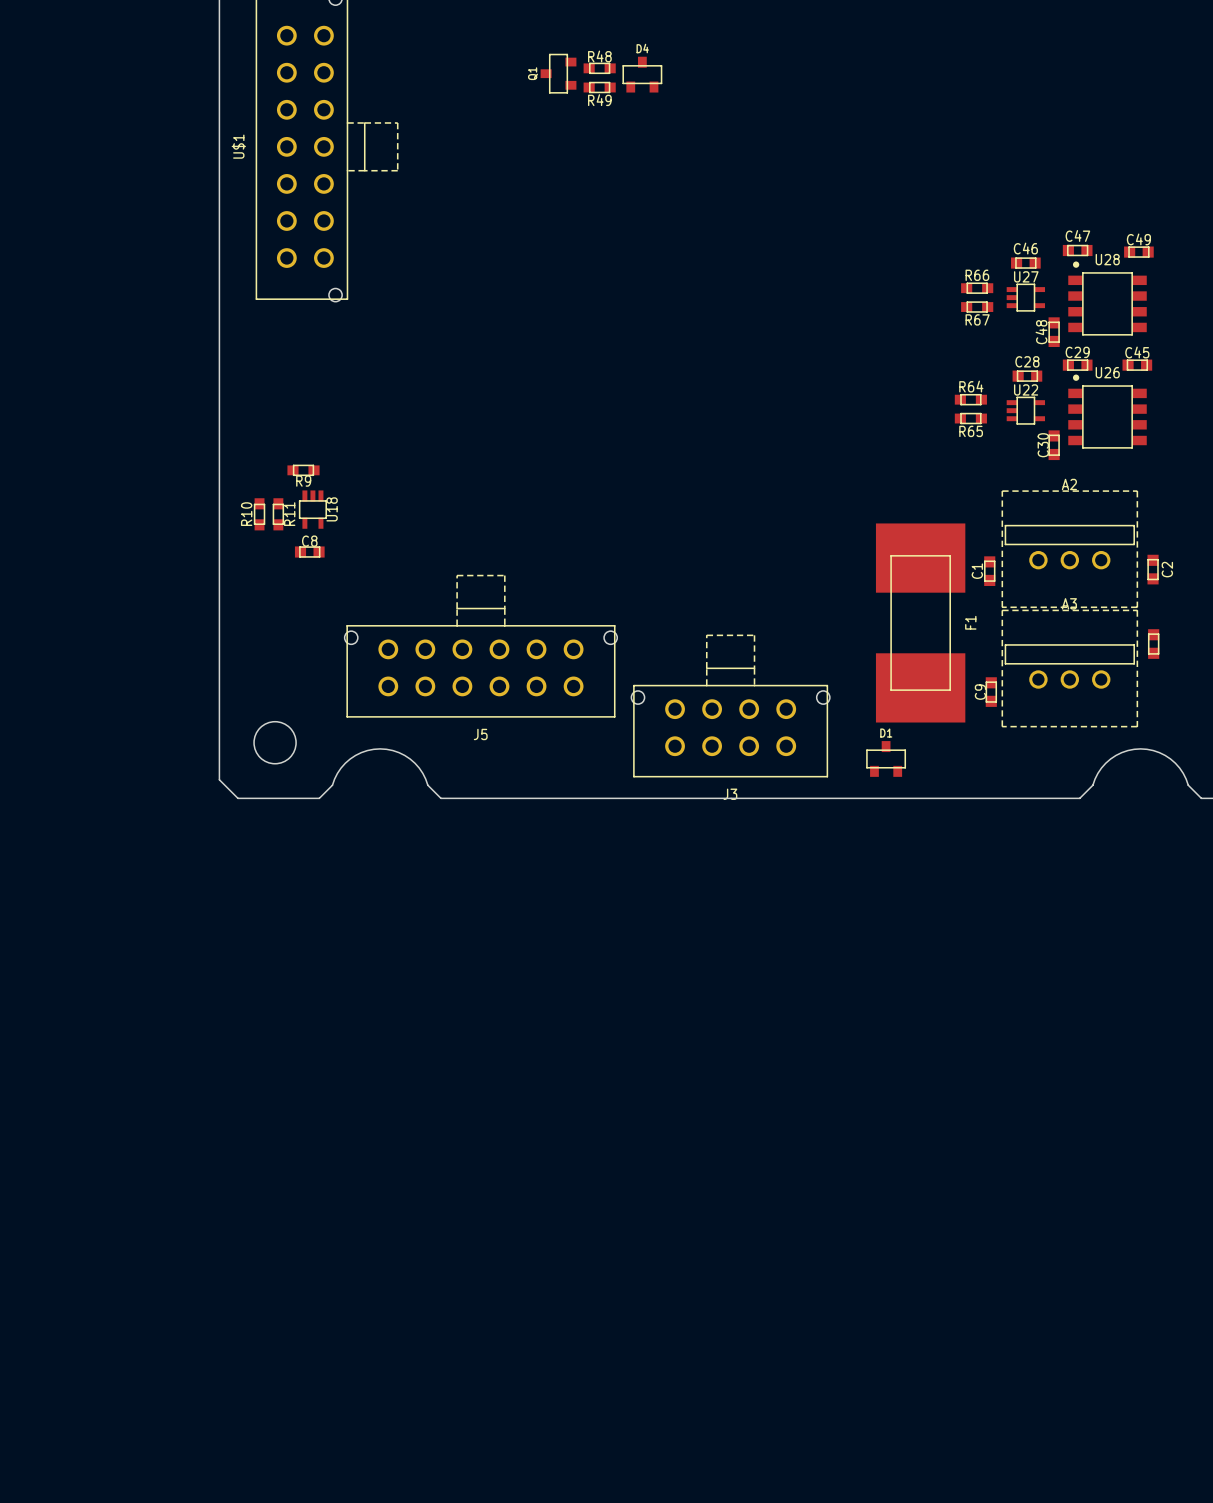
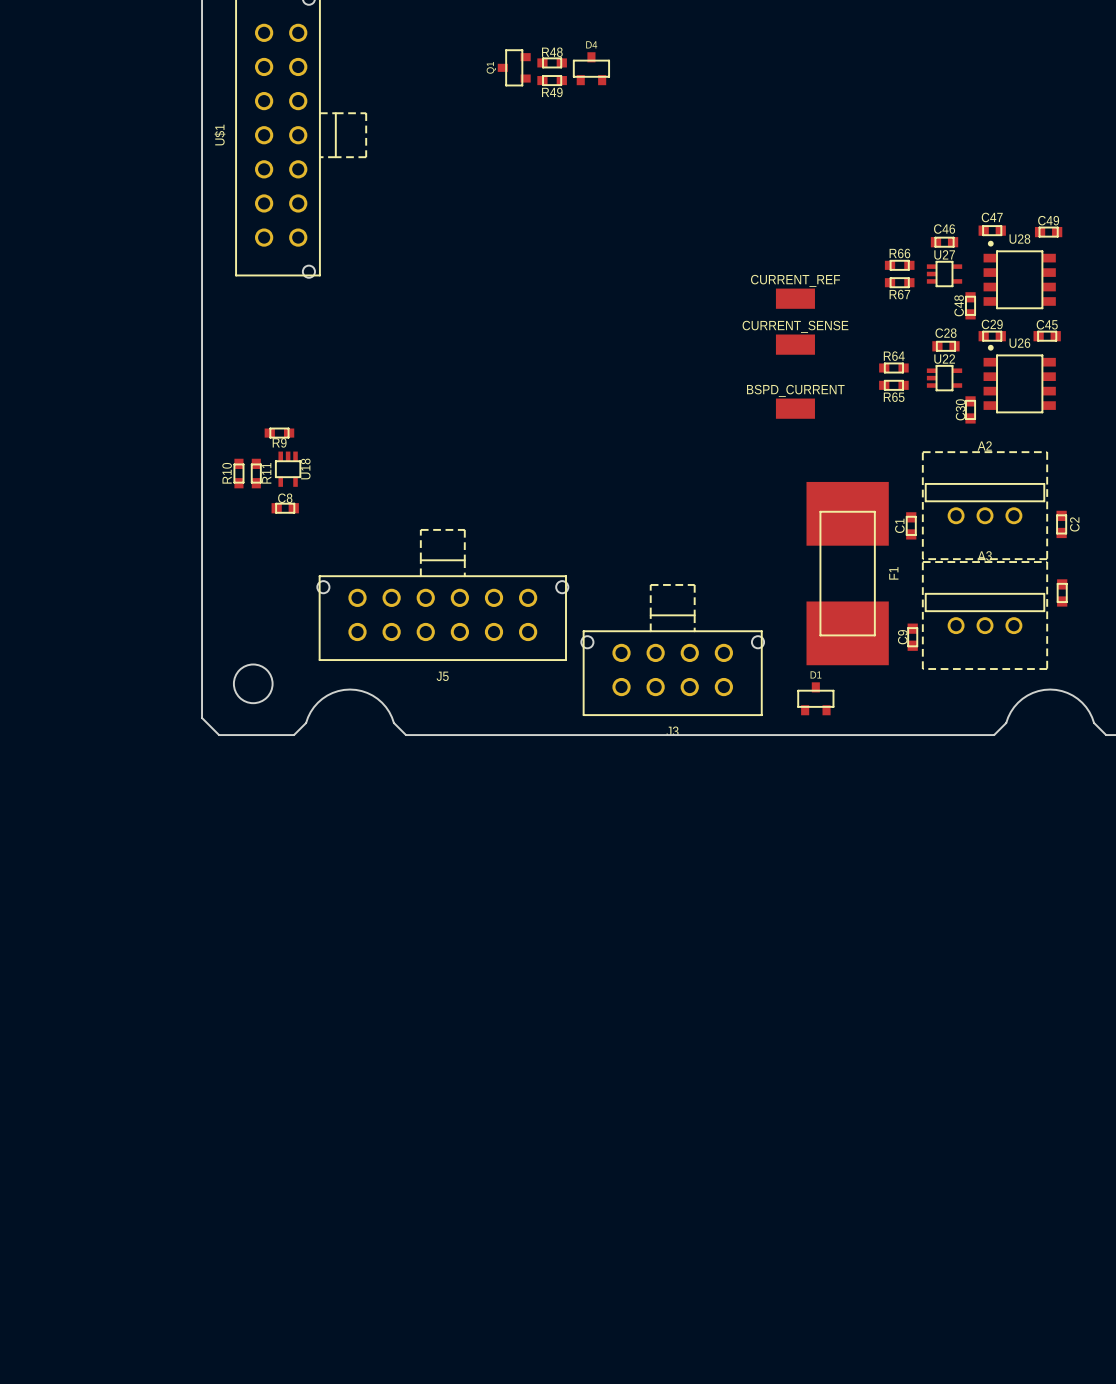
CURRENT_REF: none -> (795, 298)
CURRENT_SENSE: none -> (795, 344)
BSPD_CURRENT: none -> (795, 408)

